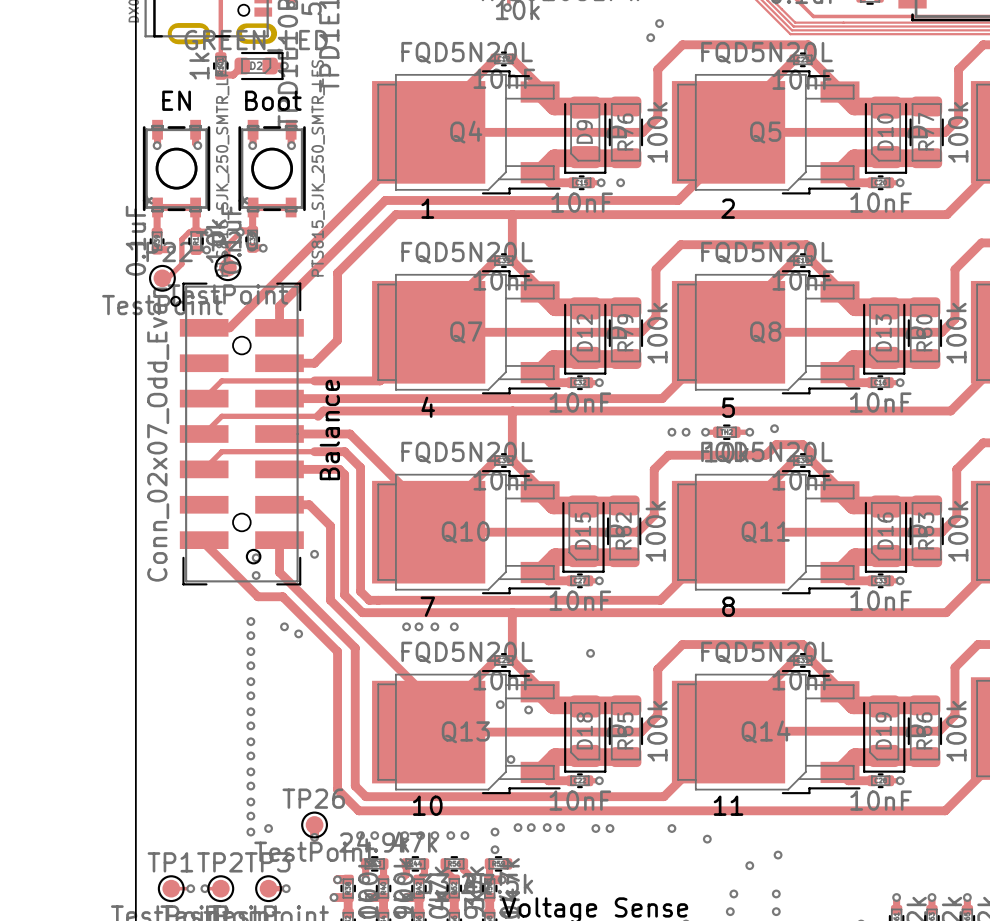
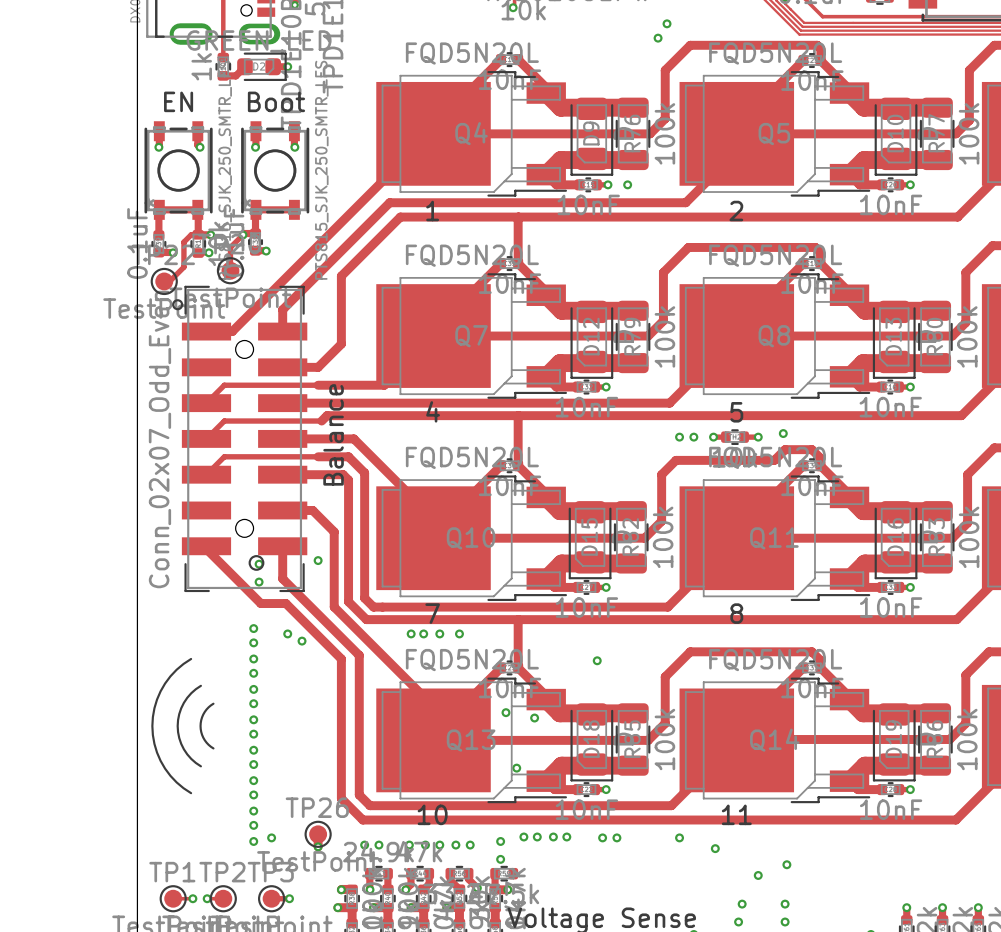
line: none -> (191, 658) (176, 669) (165, 683) (157, 699) (152, 726) (157, 752) (165, 768) (176, 782) (191, 793)
line: none -> (200, 685) (191, 693) (183, 702) (179, 714) (177, 726) (179, 738) (183, 749) (191, 758) (200, 766)
line: none -> (213, 703) (204, 711) (200, 726) (204, 740) (213, 748)

